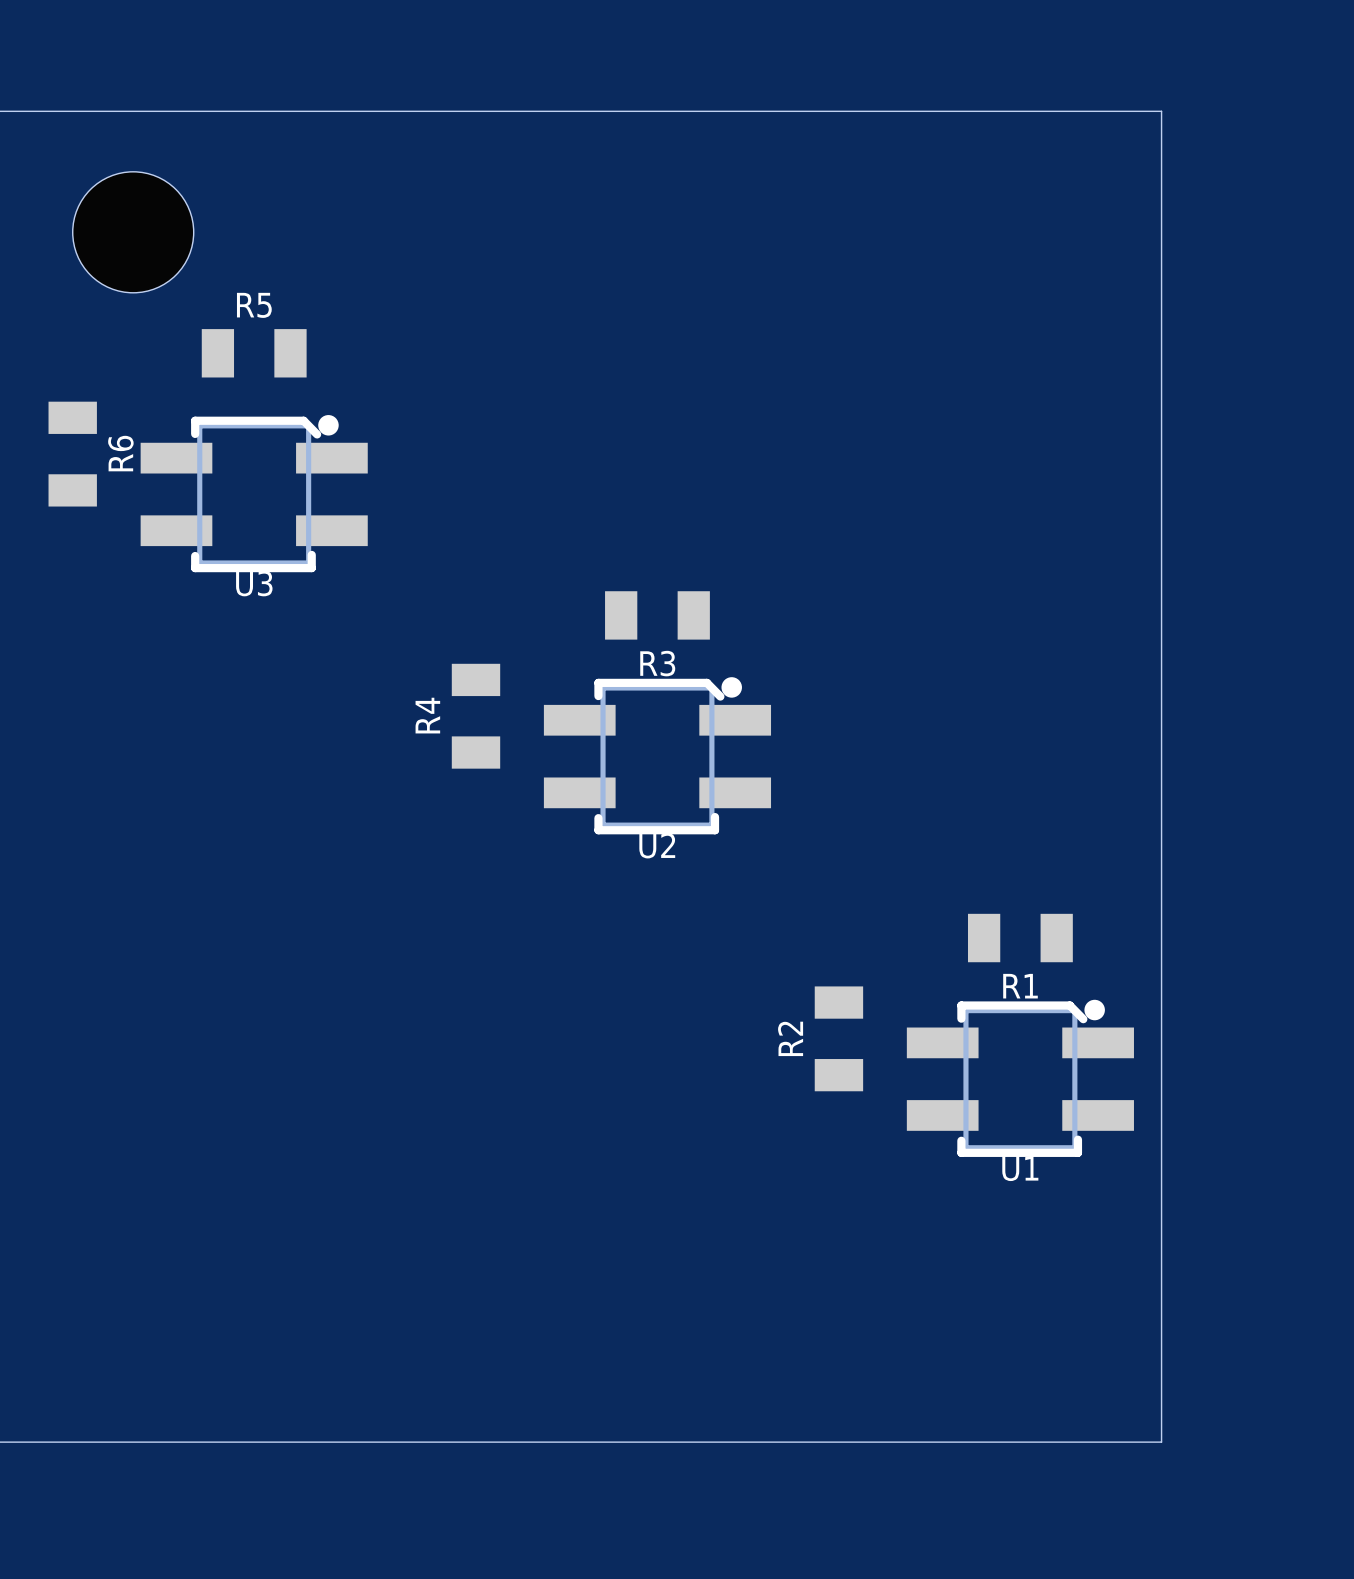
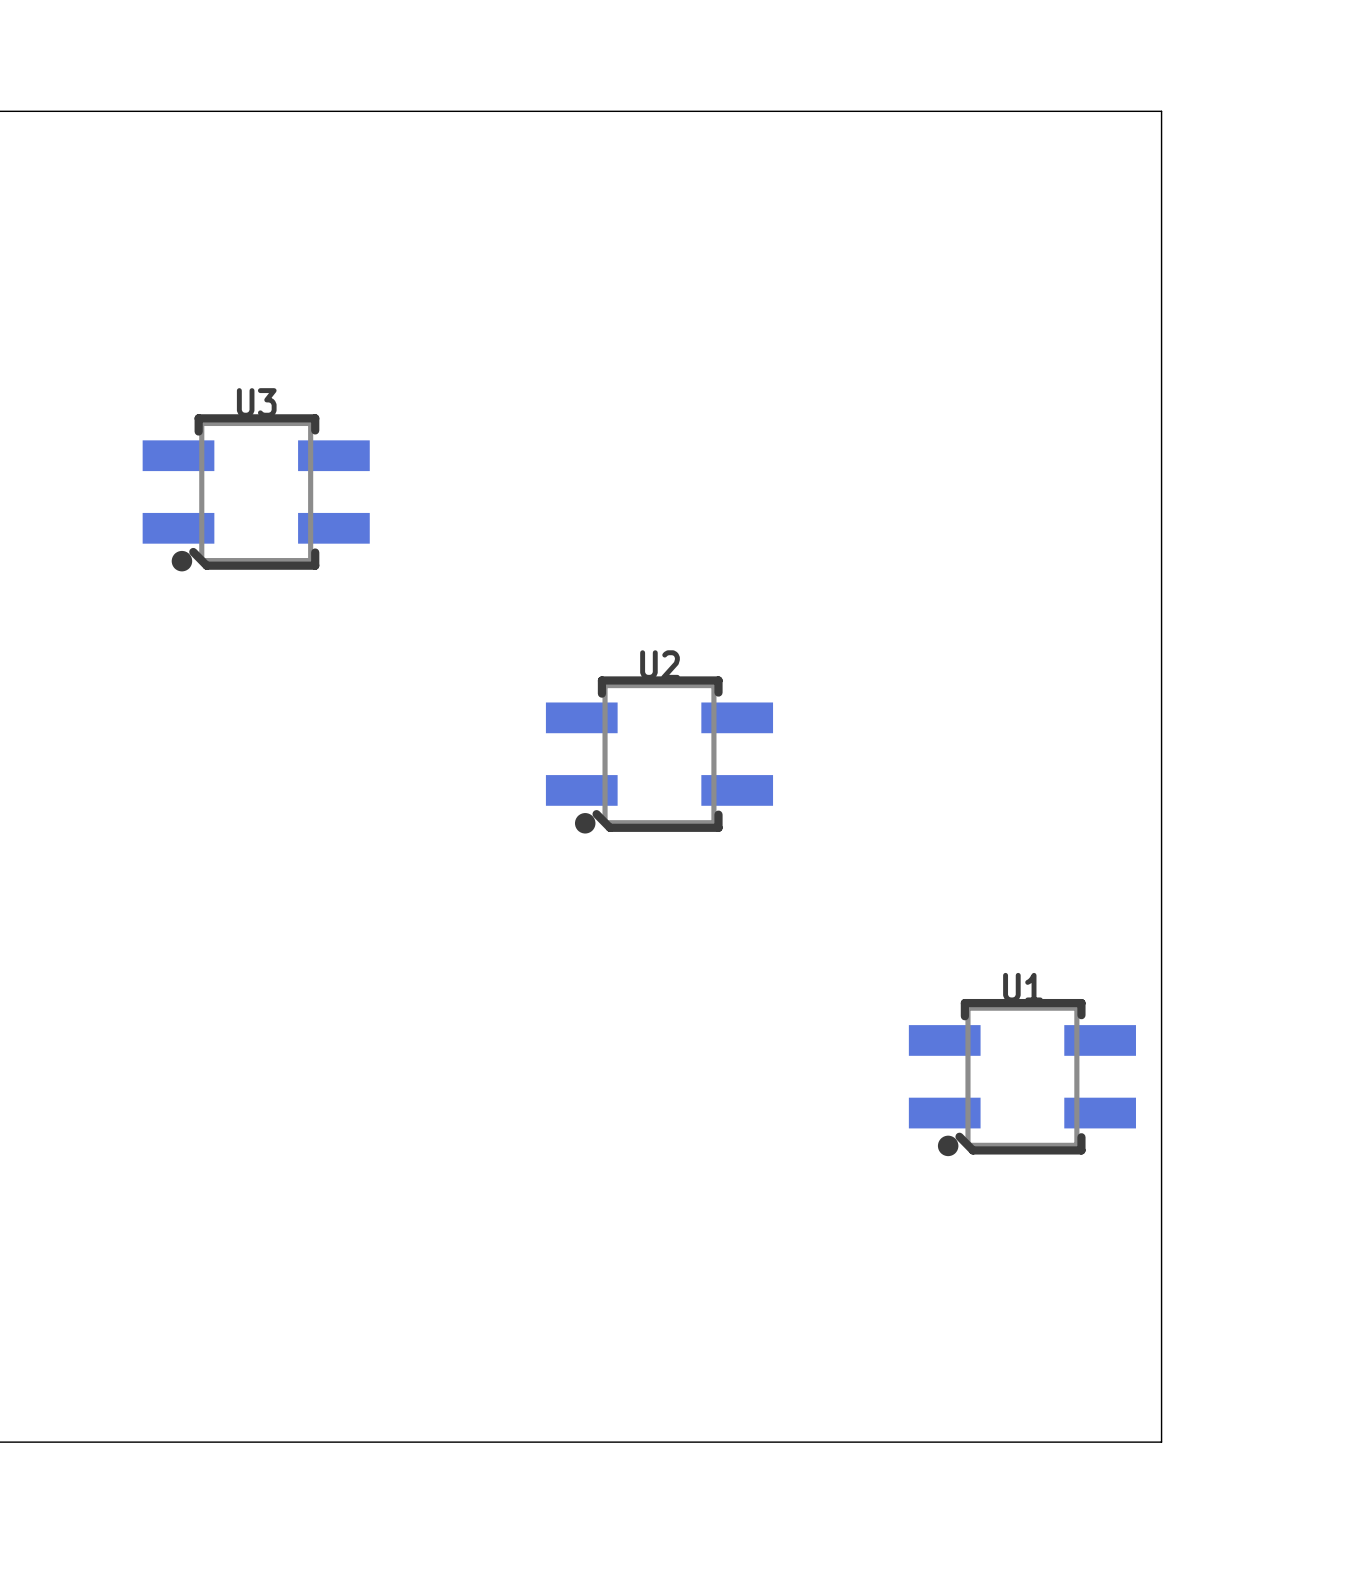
hole: (133, 232) -> none
R5: (254, 353) -> none
R6: (72, 454) -> none
U3 rotation: 0° (254, 493) -> 180° (256, 492)
R3: (657, 615) -> none
R4: (475, 716) -> none
U2 rotation: 0° (657, 755) -> 180° (659, 754)
R1: (1020, 938) -> none
R2: (838, 1038) -> none
U1 rotation: 0° (1020, 1078) -> 180° (1022, 1077)

